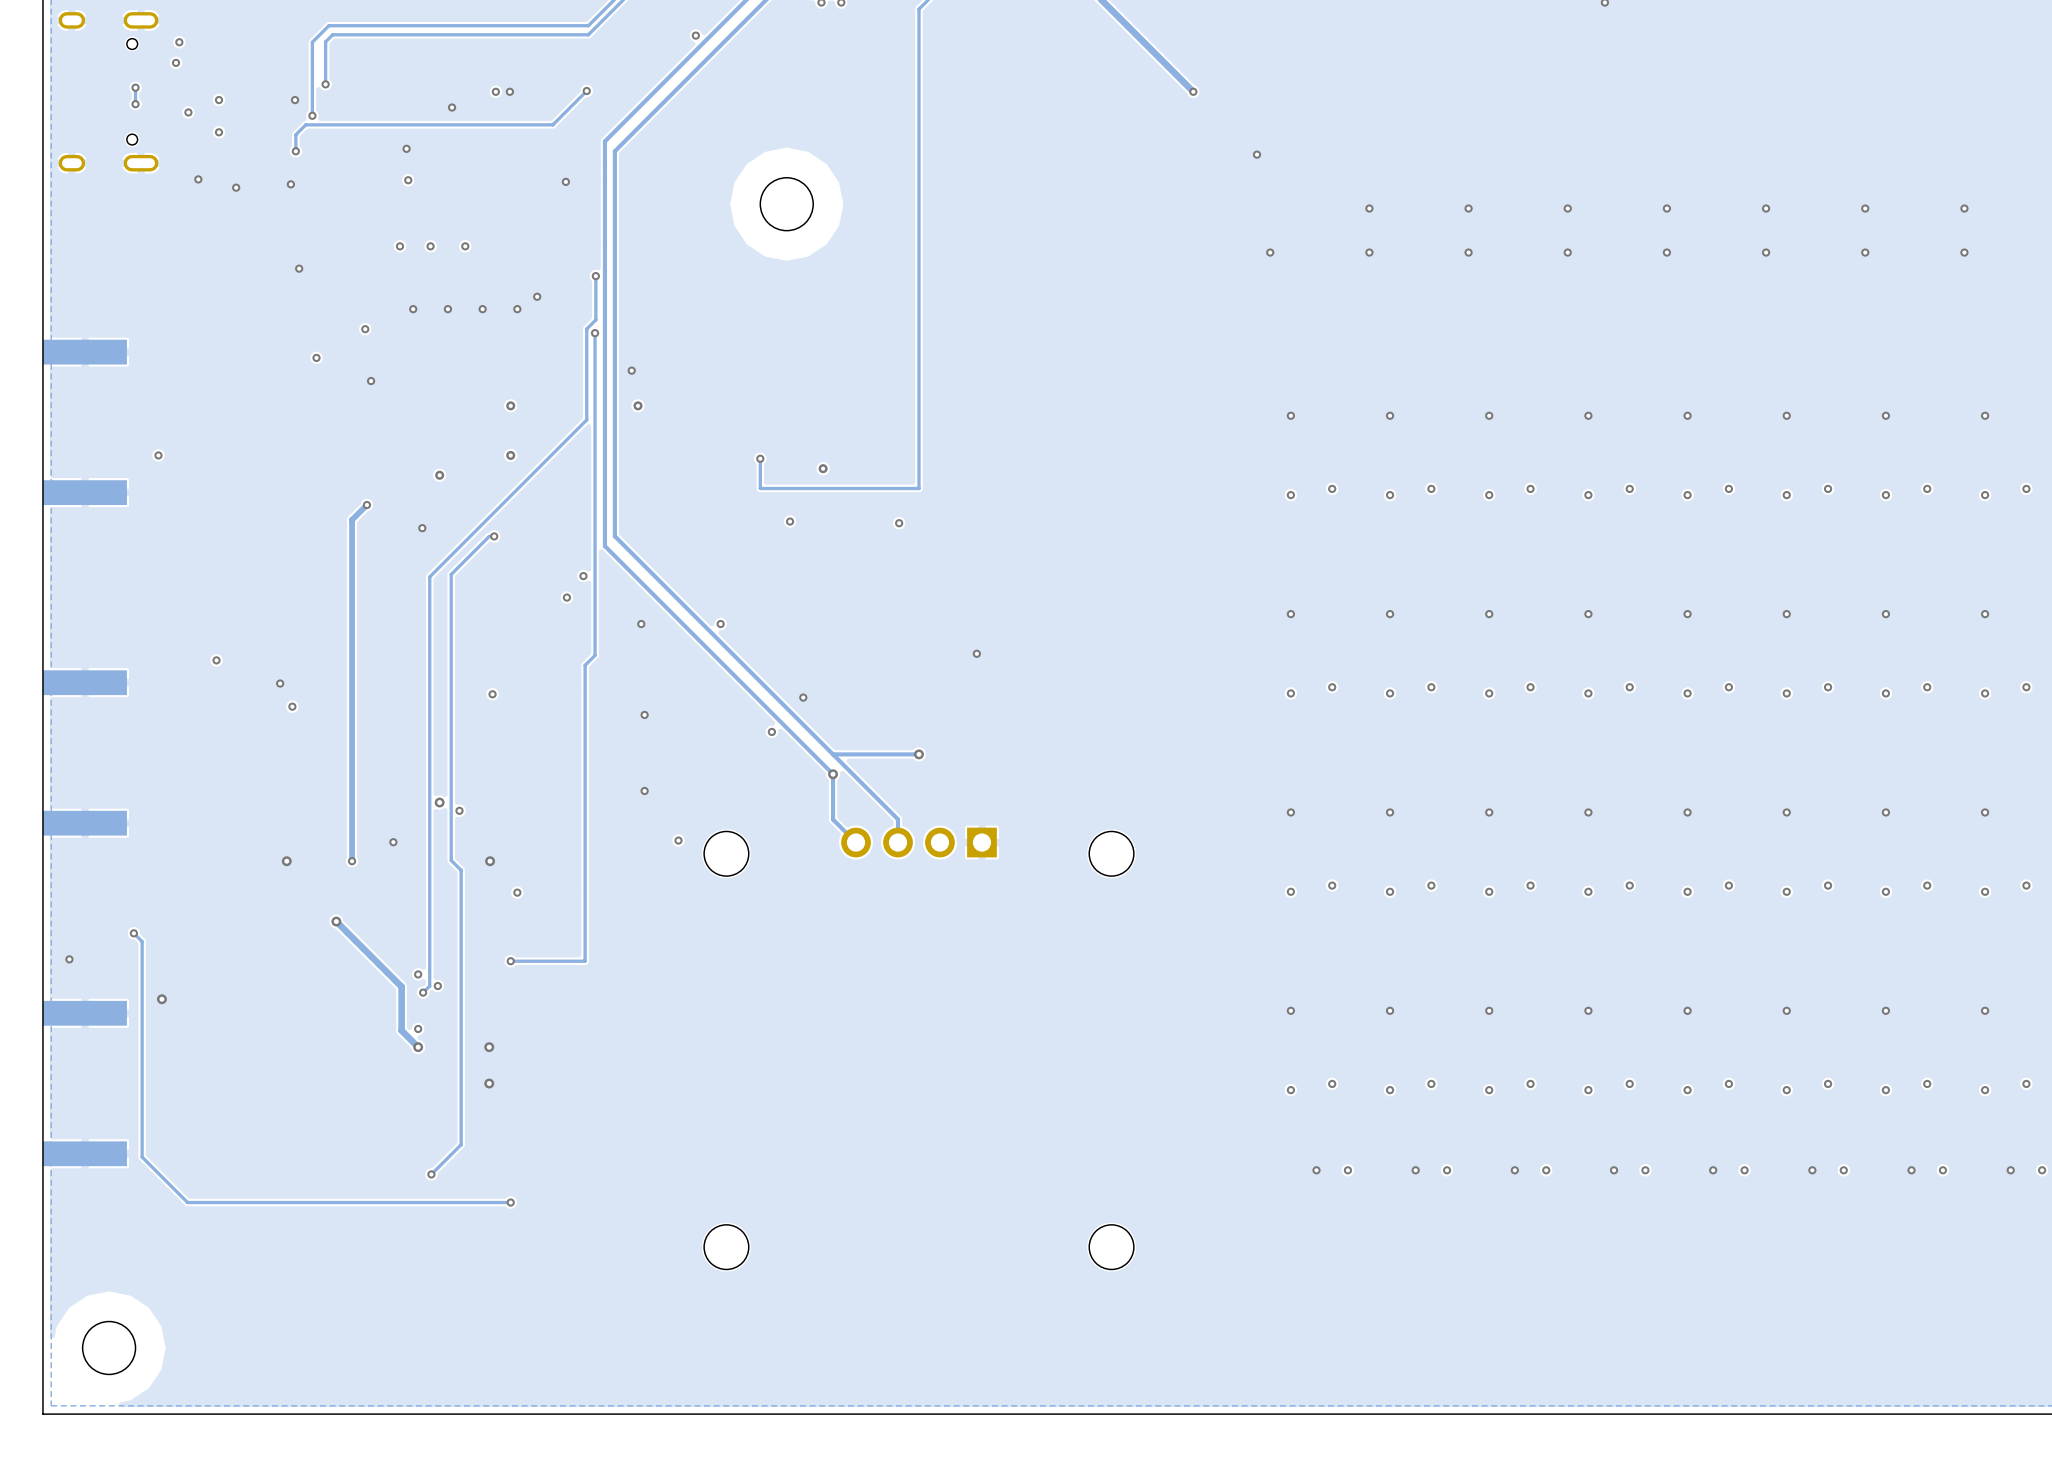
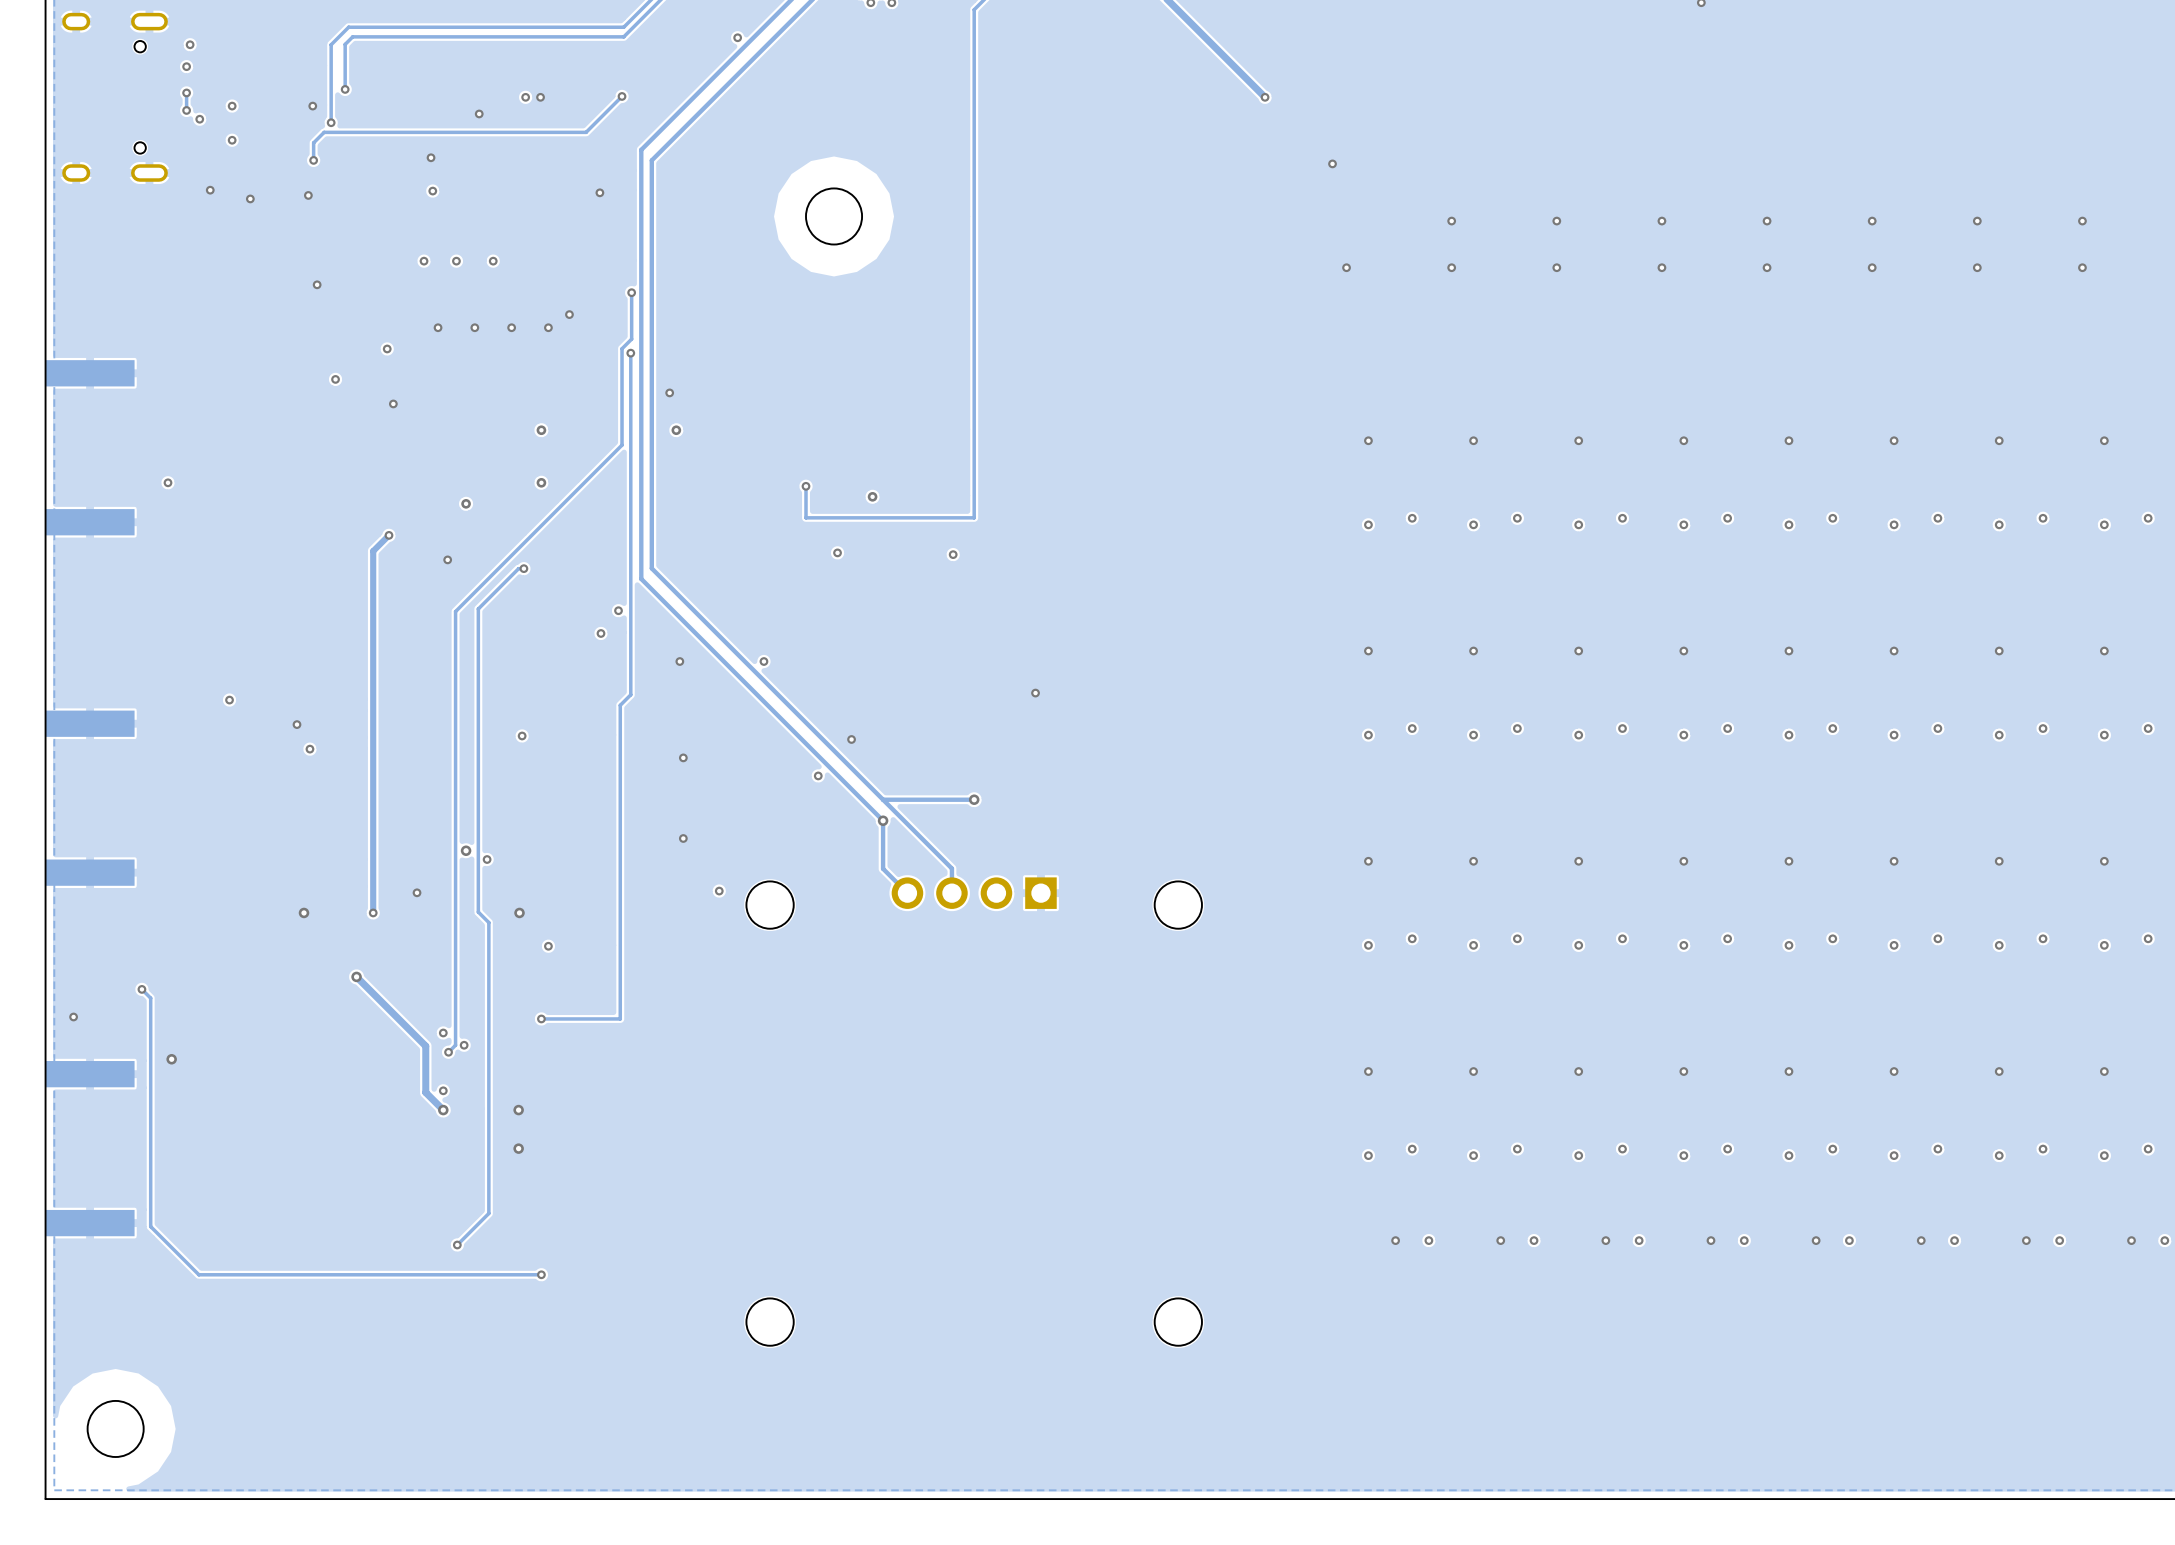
track: (135, 87) (135, 104) -> (186, 92) (186, 110)
via: (135, 87) -> none
via: none -> (186, 92)
via: (135, 104) -> none
via: none -> (186, 110)

